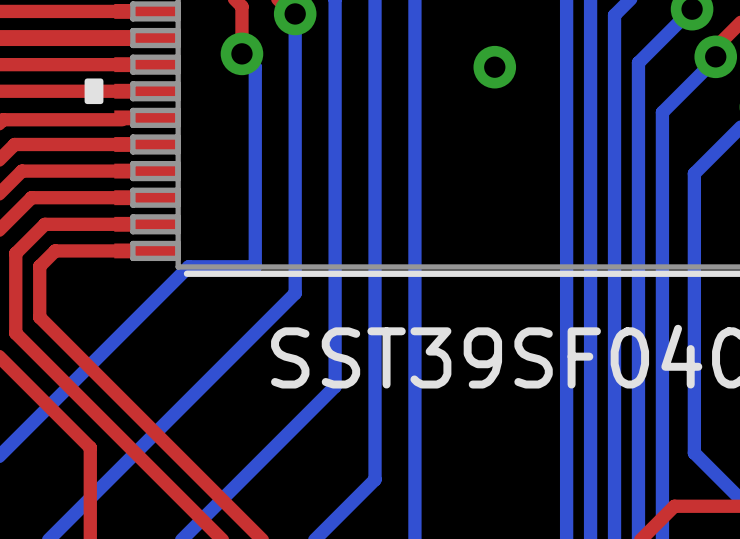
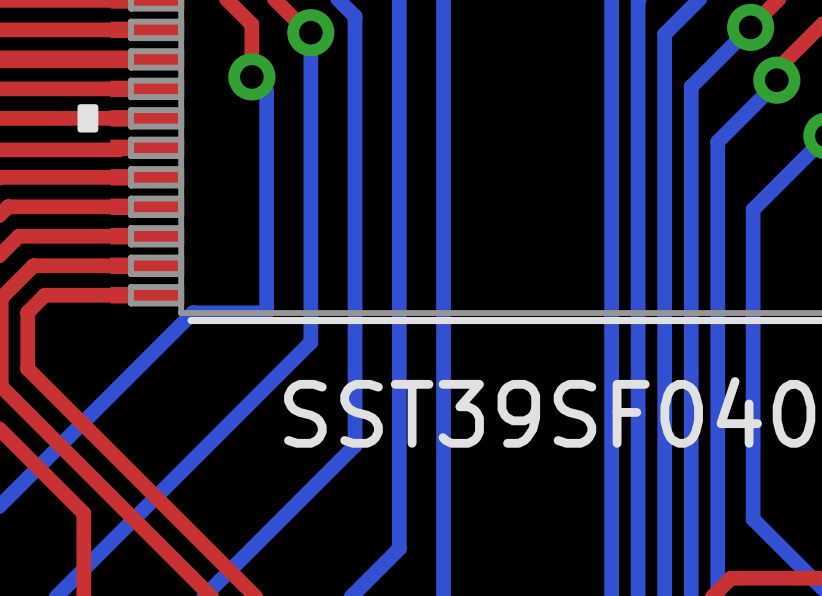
via: (494, 67) -> none

